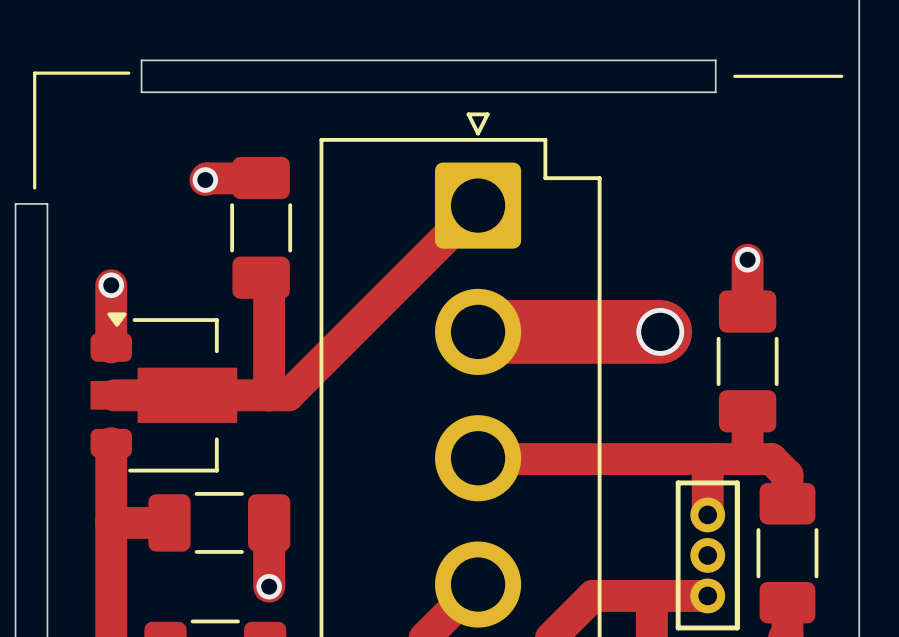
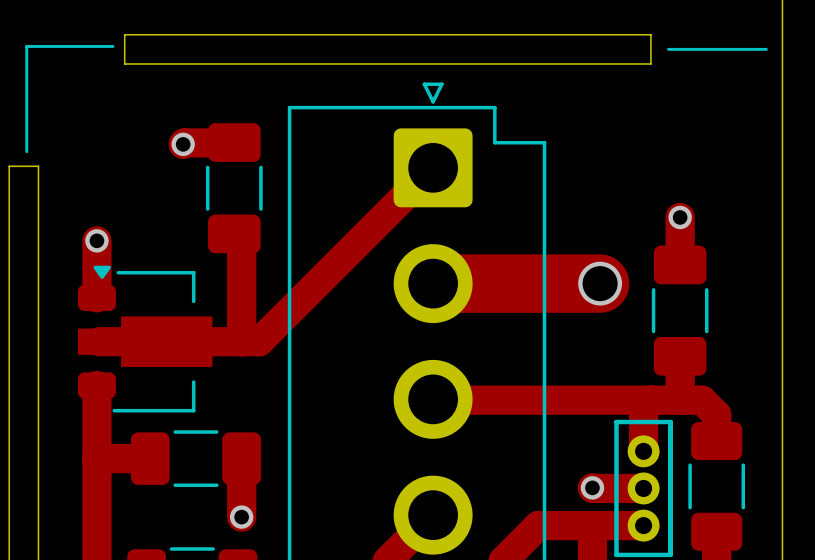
track: none -> (592, 487) (643, 488)
via: none -> (592, 487)

